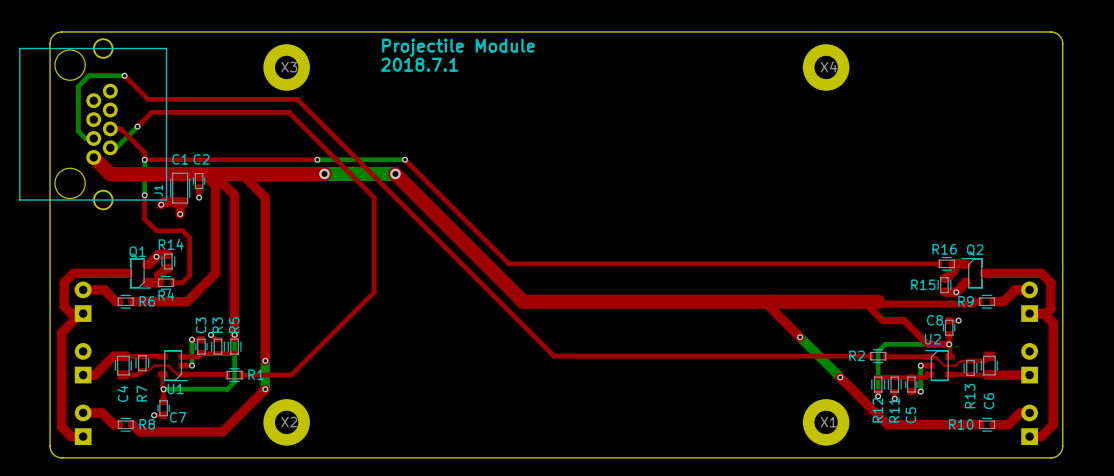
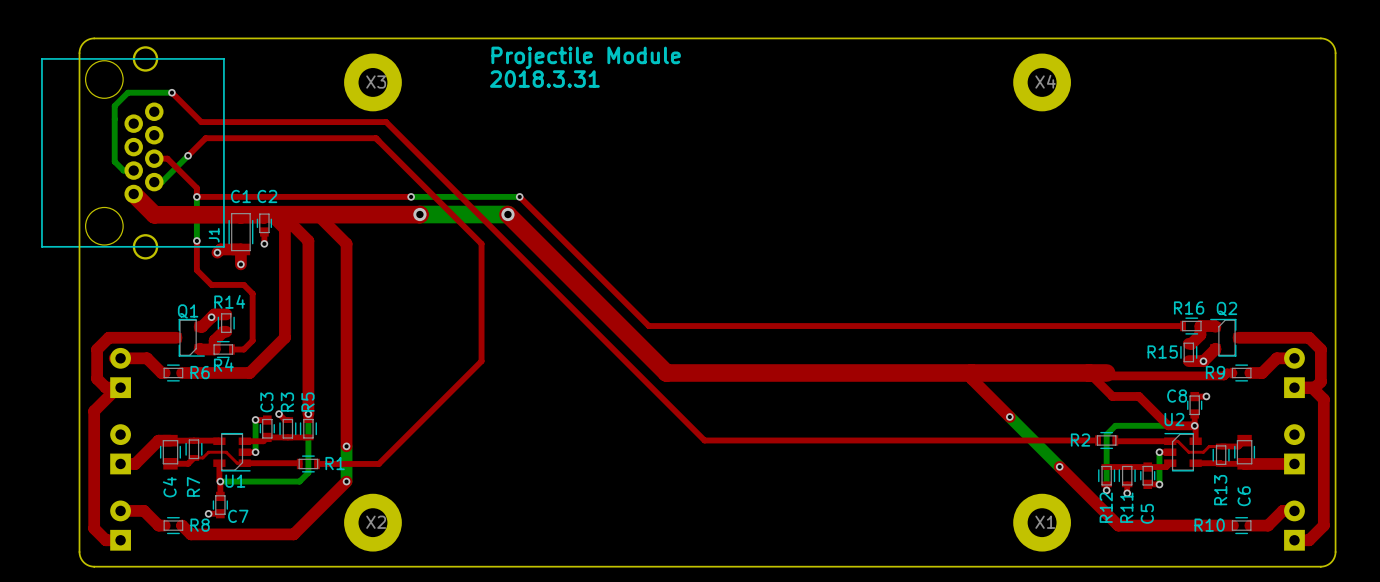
text: 2018.7.1 (419, 64) -> 2018.3.31 (544, 79)

